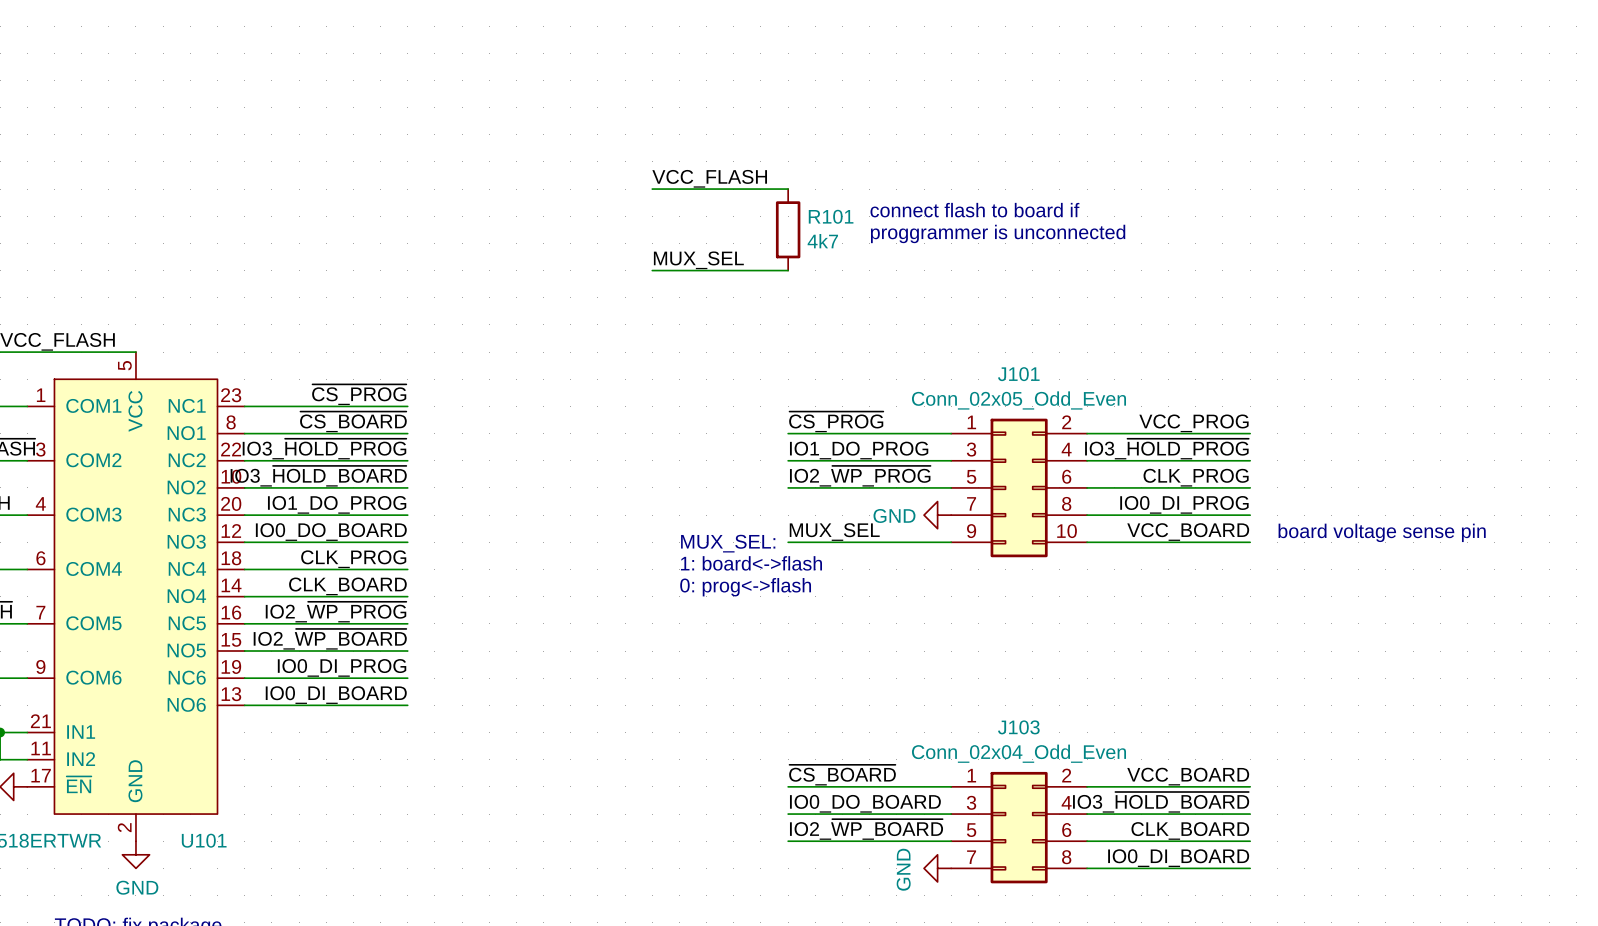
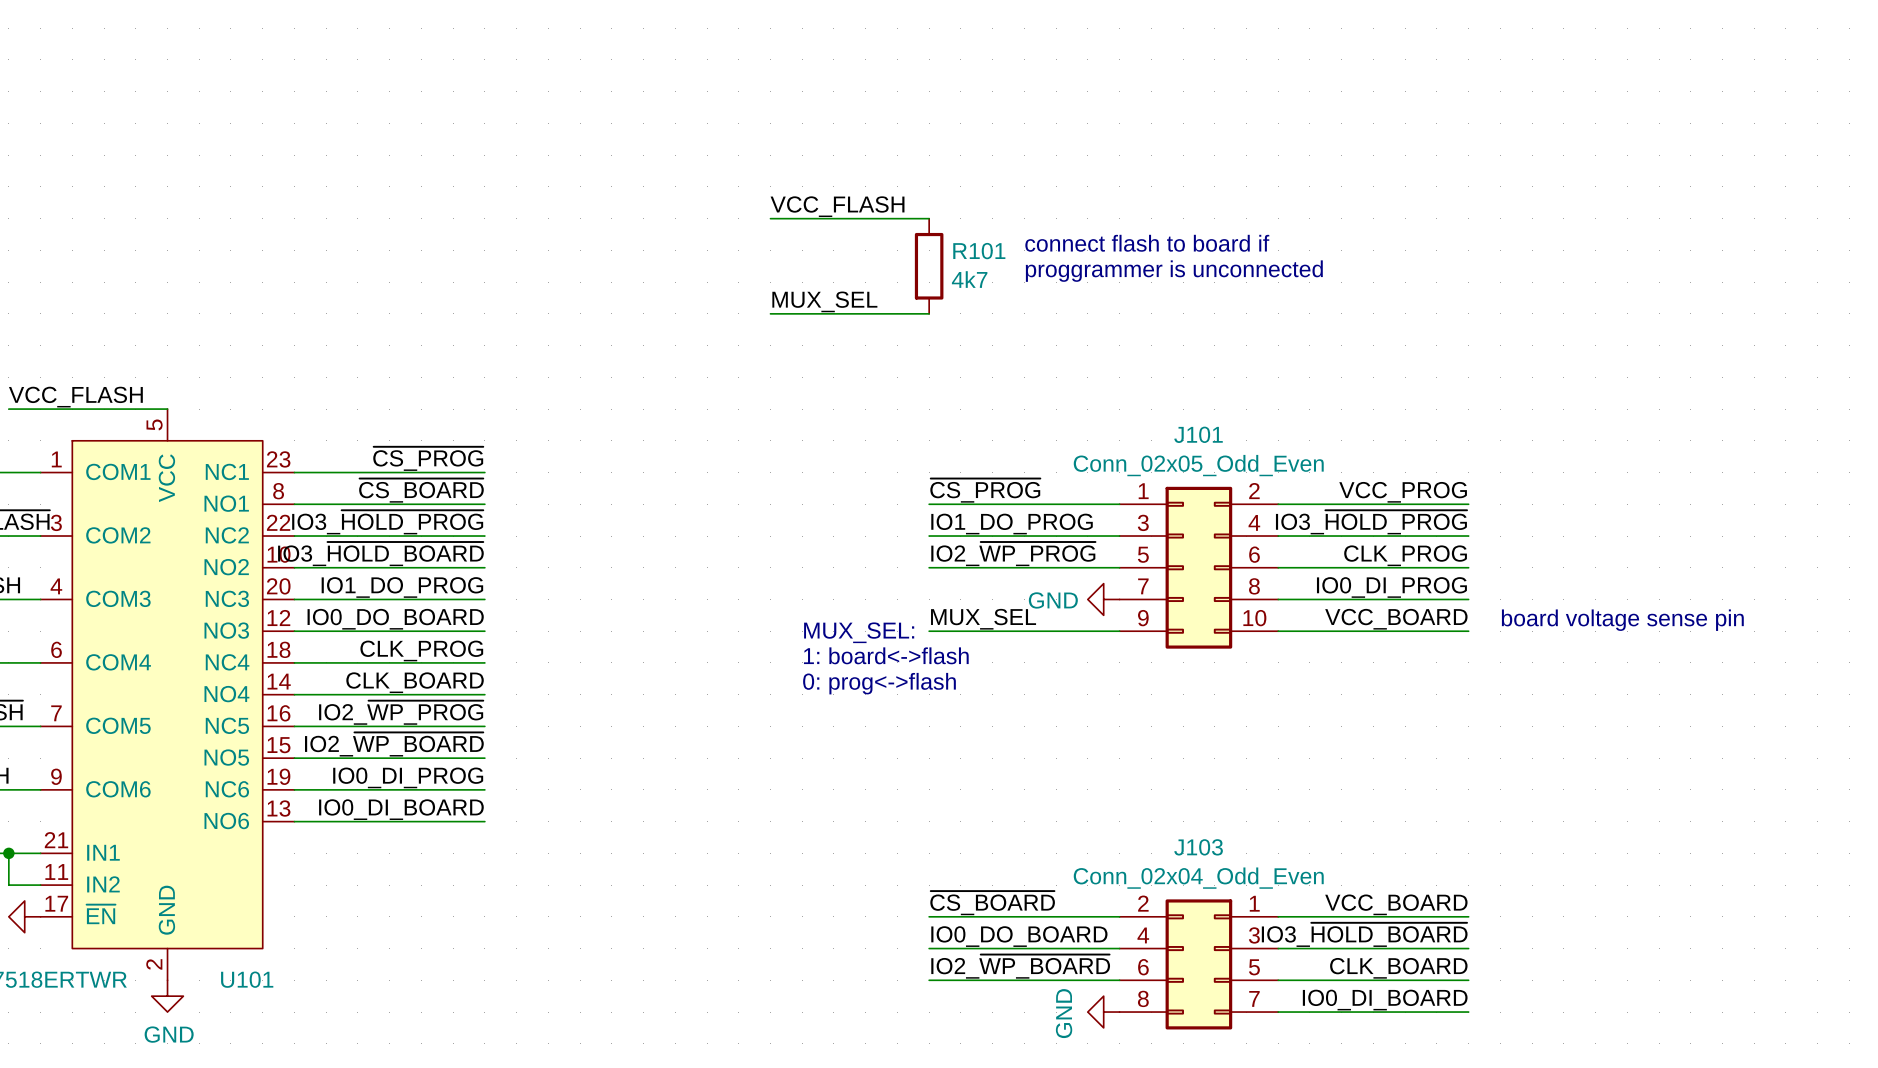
J103 flip: as is (1019, 827) -> left-right (1198, 964)

